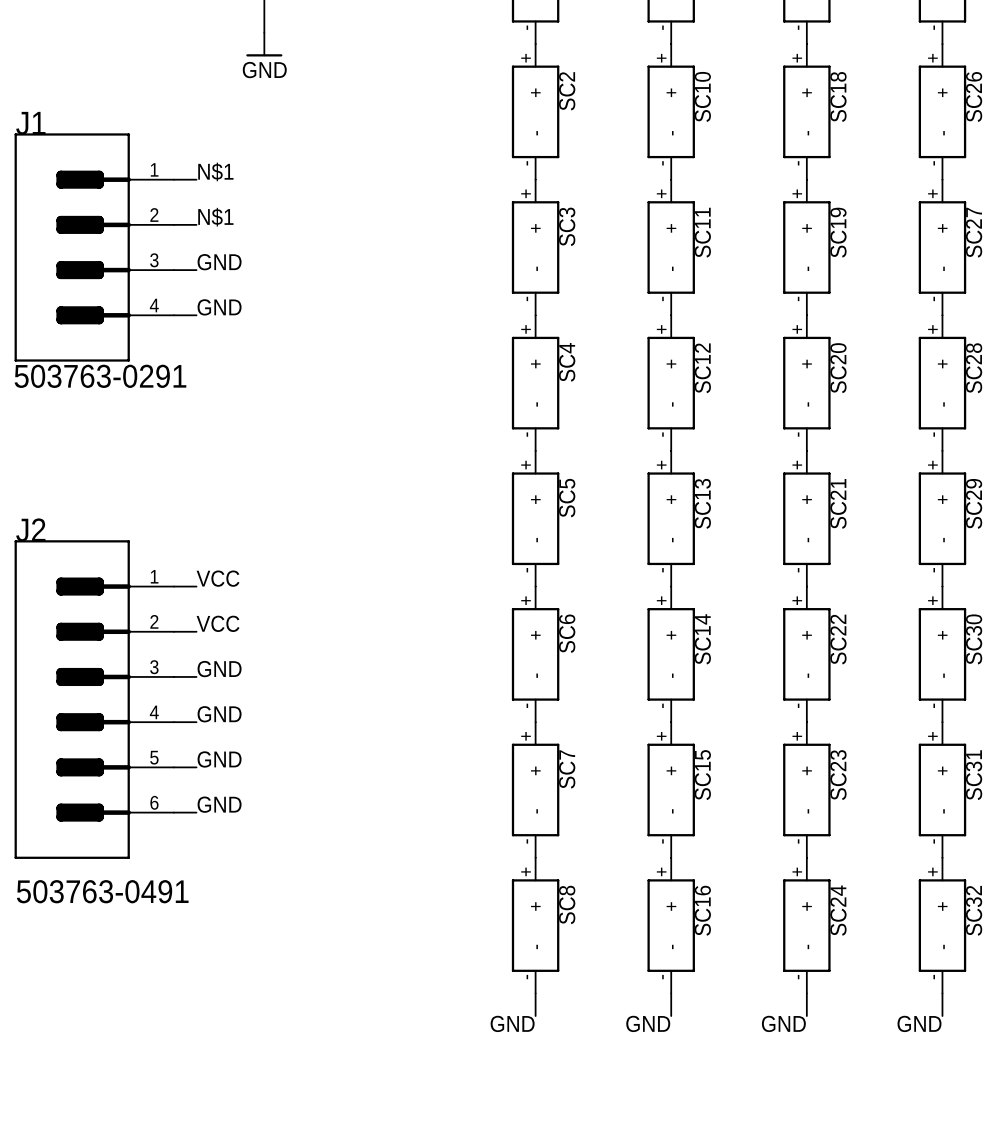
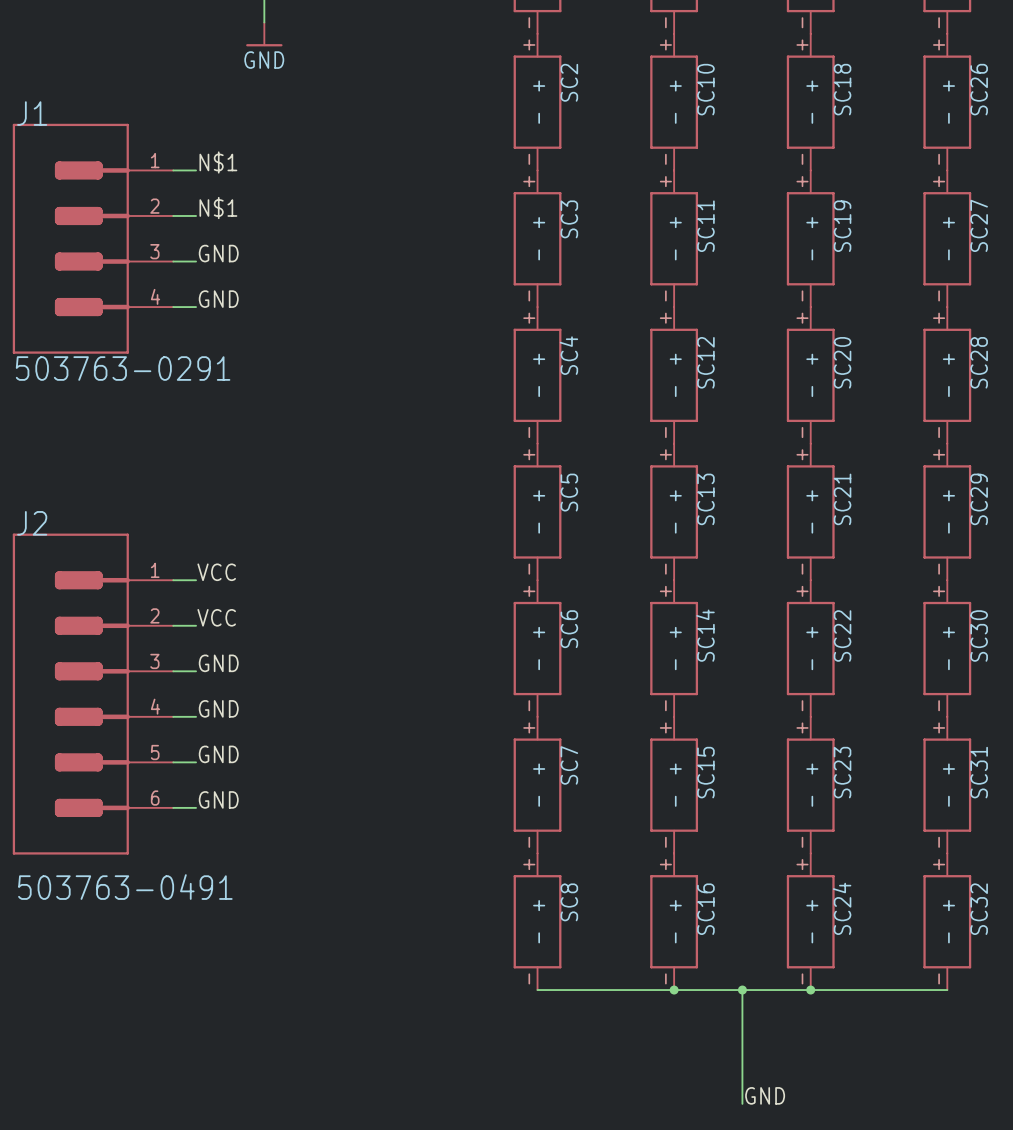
wire: (535, 993) (535, 1016) -> (537, 990) (947, 990)
wire: (671, 993) (671, 1016) -> none
junction: none -> (674, 990)
wire: none -> (742, 990) (742, 1103)
junction: none -> (742, 990)
wire: (806, 993) (806, 1016) -> none
junction: none -> (810, 990)
wire: (942, 993) (942, 1016) -> none
label: GND (512, 1023) -> none
label: GND (648, 1023) -> none
label: GND (783, 1023) -> none
label: GND (919, 1023) -> none
label: none -> GND (765, 1095)

